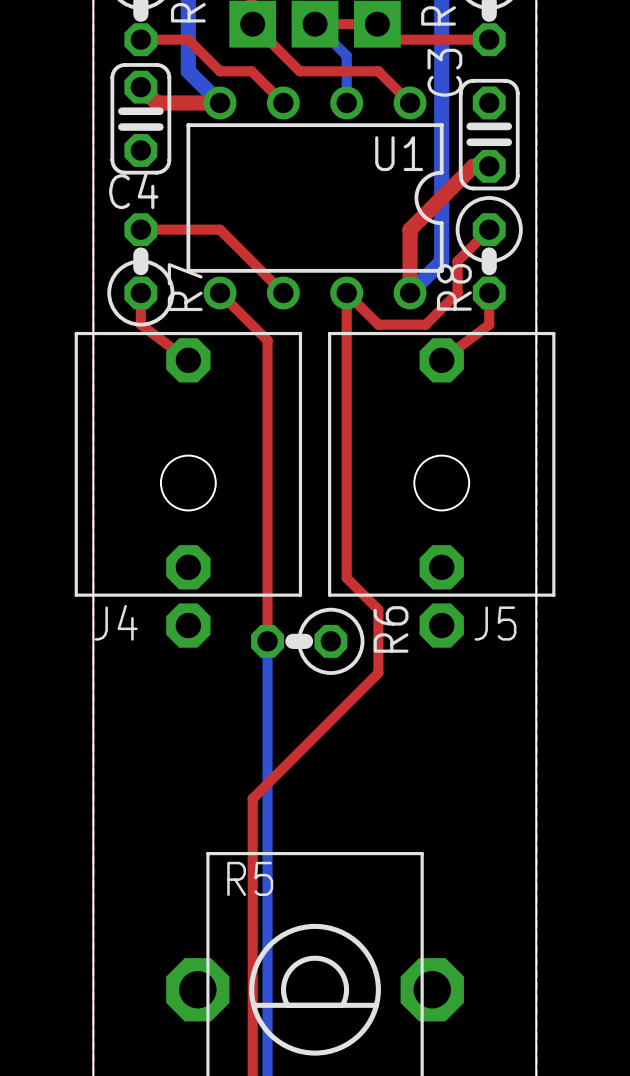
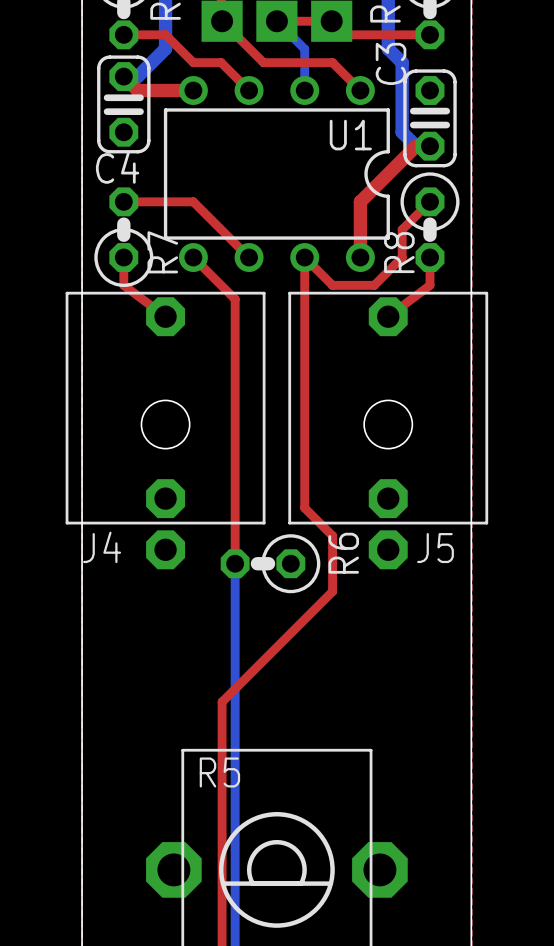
bottom track: (188, 55) (188, 71) (220, 102) -> (165, 48) (137, 76) (123, 76)
bottom track: (441, 55) (441, 261) (410, 293) -> (388, 48) (402, 62) (402, 132) (416, 146) (430, 146)

